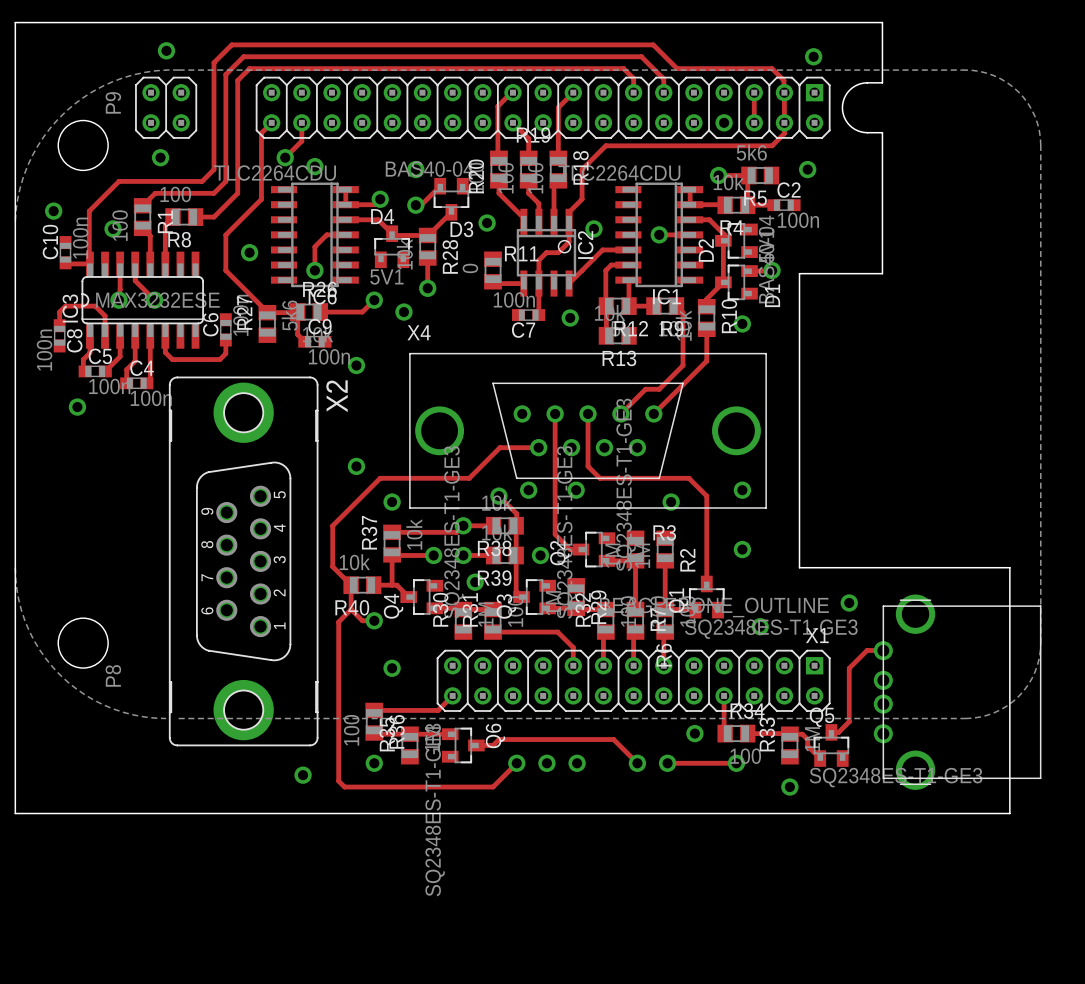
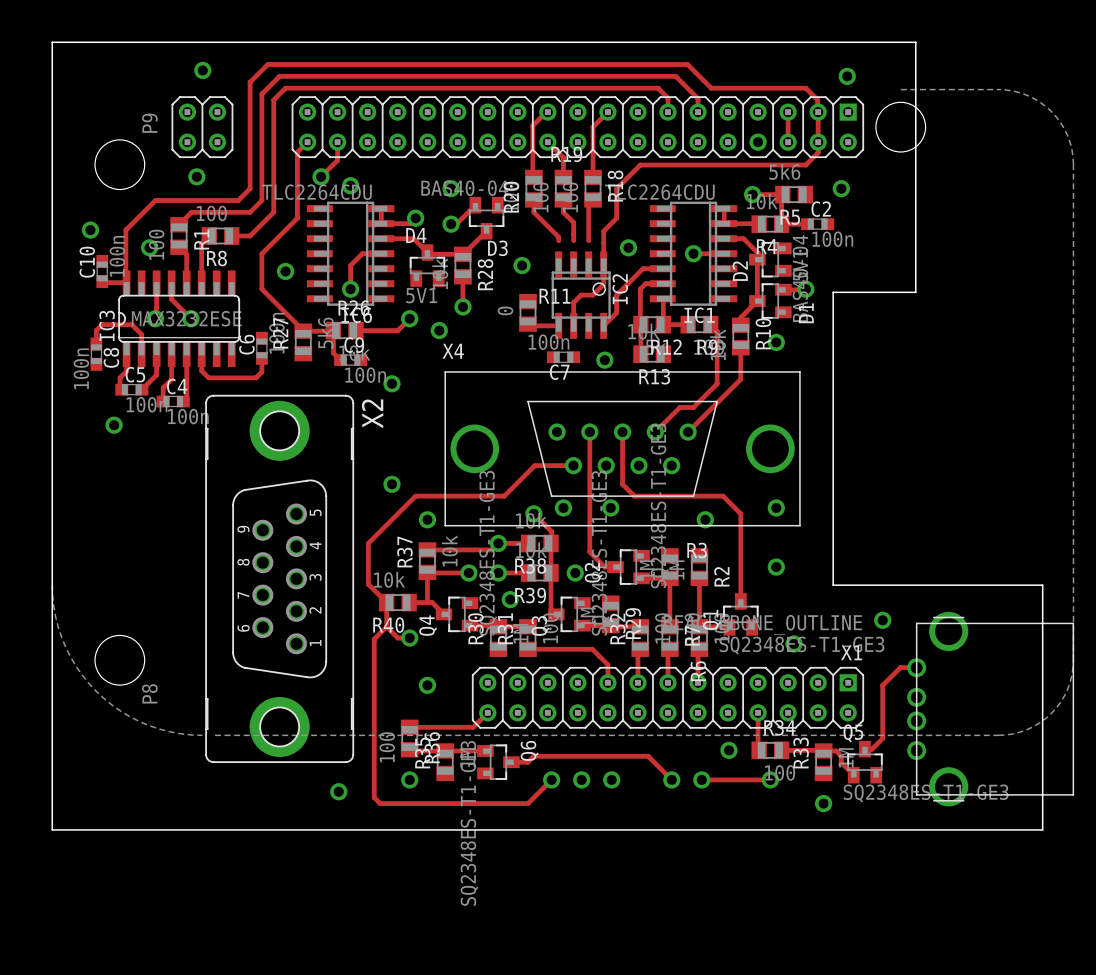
X1 footprint: [14, 21, 1042, 815] -> [51, 41, 1075, 831]
via position: (487, 223) -> (522, 265)
track: (569, 241) (558, 252) (546, 252) (538, 260) (538, 283) -> (603, 260) (603, 284) (593, 295) (581, 295) (573, 302)
track: (608, 249) (602, 249) (569, 283) -> (643, 268) (616, 295) (616, 312) (603, 325)
IC2 position: (546, 252) -> (581, 295)
R11 position: (493, 270) -> (527, 312)
track: (493, 281) (493, 283) (523, 283) -> (527, 324) (528, 325) (558, 325)
C7 position: (528, 315) -> (563, 357)
via position: (570, 318) -> (604, 360)

